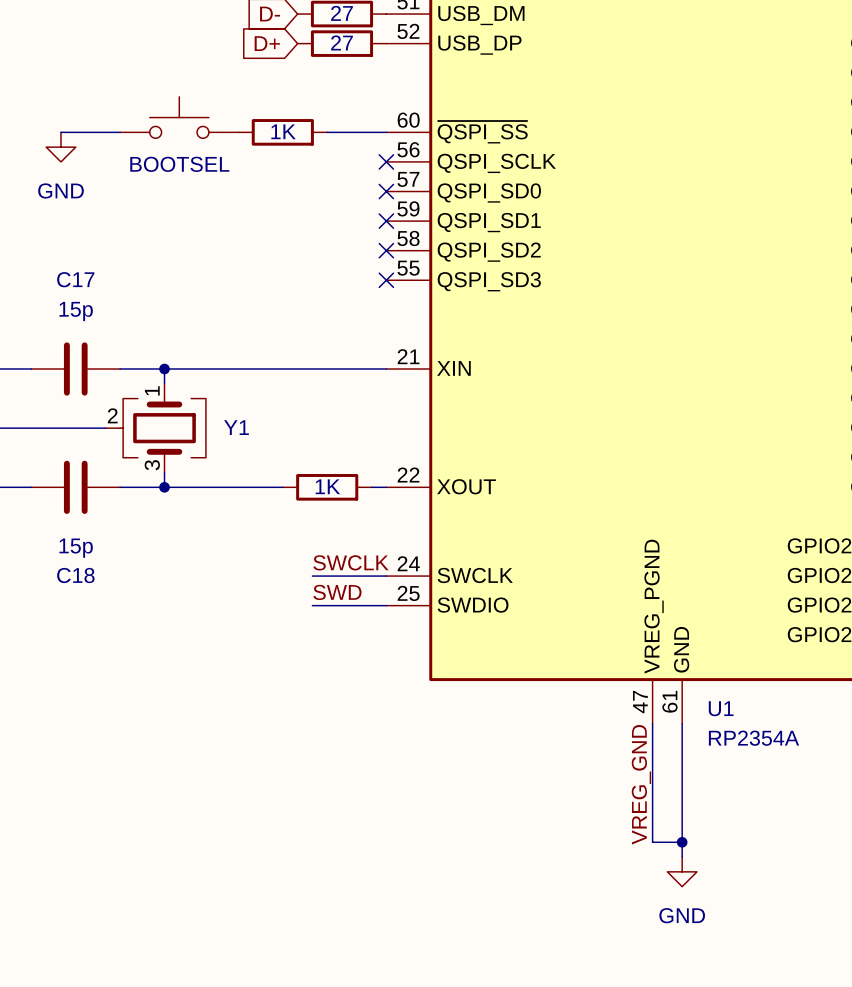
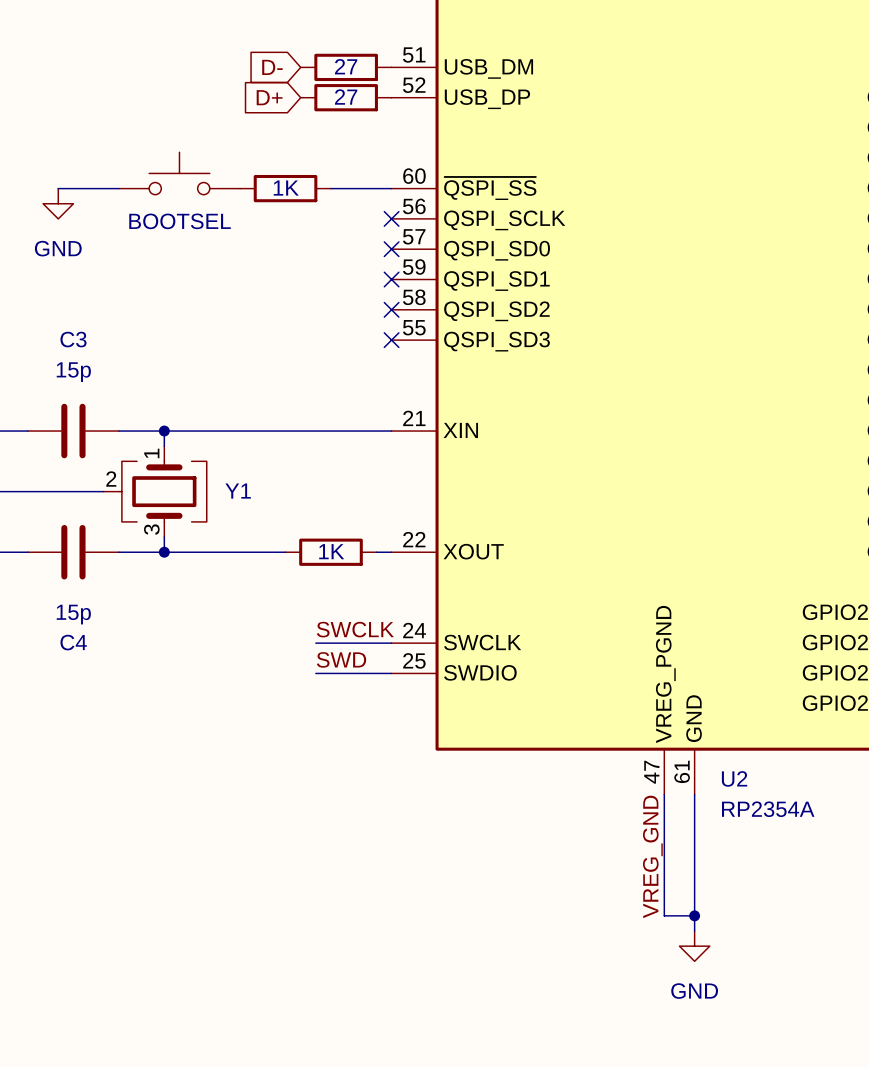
C17 name: C17 (75, 279) -> C3 (73, 339)
C18 name: C18 (75, 575) -> C4 (73, 642)
U1 name: U1 (721, 708) -> U2 (734, 778)

